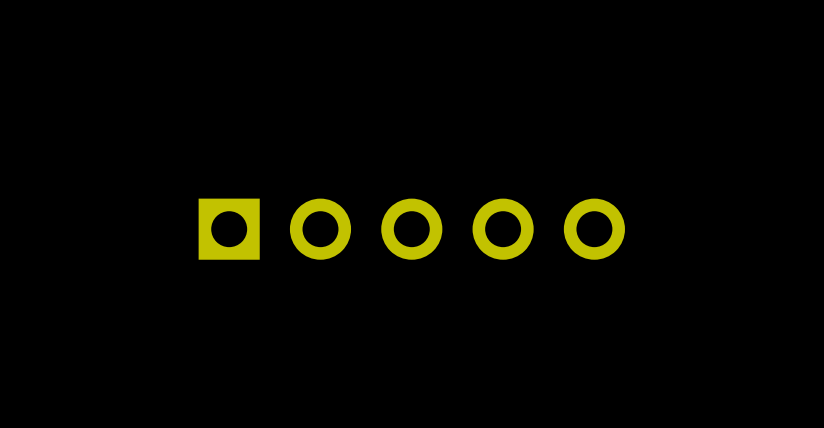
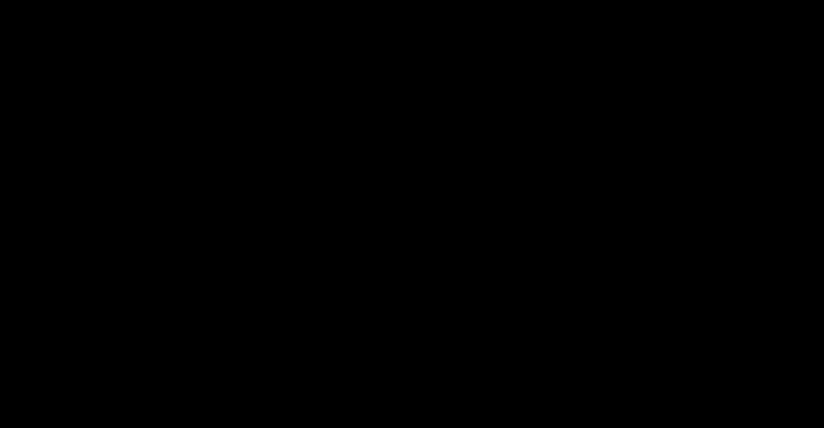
part: (411, 229) -> none

